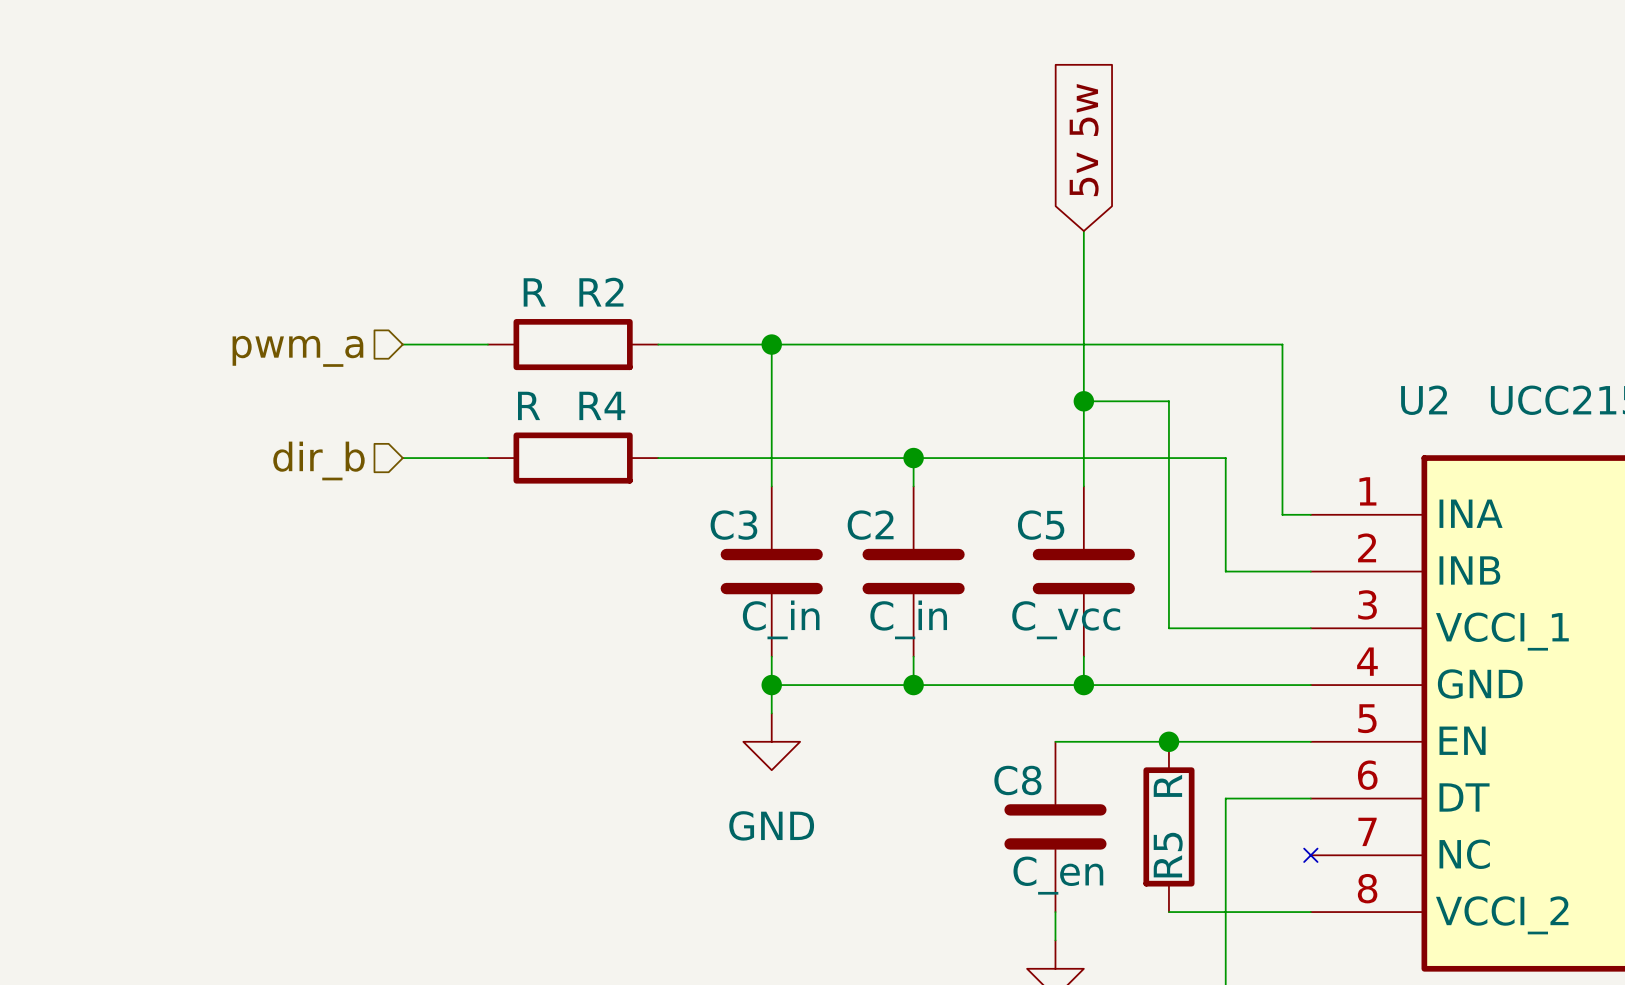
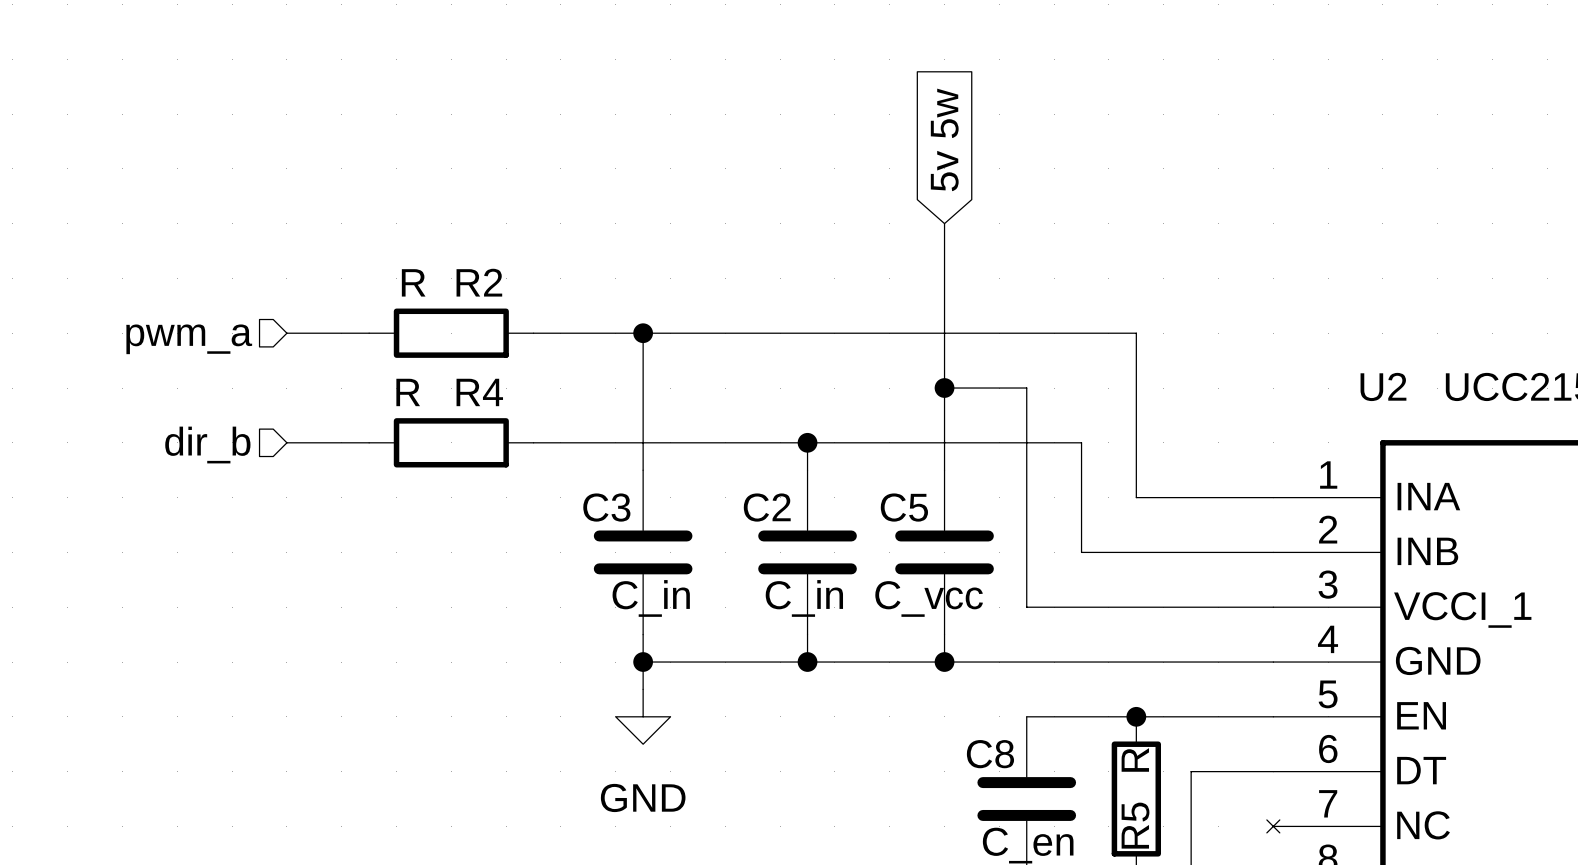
global label position: 5v 5w (1084, 140) -> 5v 5w (944, 139)
wire: (1083, 231) (1083, 486) -> (944, 223) (944, 470)
wire: (402, 344) (487, 344) -> (286, 333) (369, 333)
wire: none -> (533, 333) (643, 333) (643, 470)
R2 position: (573, 344) -> (451, 333)
junction: none -> (643, 333)
wire: (771, 344) (771, 486) -> none
junction: (771, 344) -> none
wire: (1168, 344) (1282, 344) (1282, 514) -> none
hierarchical label position: pwm_a (297, 351) -> pwm_a (189, 339)
wire: none -> (944, 388) (1026, 388) (1026, 607) (1136, 607)
junction: none -> (944, 388)
wire: (1083, 401) (1168, 401) -> (1136, 333) (1136, 388)
junction: (1083, 401) -> none
wire: (402, 458) (487, 458) -> (286, 442) (369, 442)
wire: none -> (533, 442) (643, 442)
R4 position: (573, 458) -> (451, 442)
junction: none -> (807, 442)
wire: (913, 458) (913, 486) -> (807, 442) (807, 470)
junction: (913, 458) -> none
wire: (1112, 458) (1225, 458) (1225, 571) -> (1081, 442) (1081, 552) (1191, 552)
hierarchical label position: dir_b (318, 460) -> dir_b (207, 445)
wire: (1168, 514) (1168, 628) -> (1136, 497) (1245, 497)
C3 position: (771, 571) -> (643, 552)
C2 position: (913, 571) -> (807, 552)
C5 position: (1083, 571) -> (944, 552)
wire: (771, 656) (771, 713) -> (643, 634) (643, 689)
wire: (913, 656) (913, 685) -> (807, 634) (807, 662)
wire: (1083, 656) (1083, 685) -> (944, 634) (944, 662)
wire: none -> (643, 662) (752, 662)
junction: none -> (643, 662)
junction: (771, 685) -> none
junction: none -> (807, 662)
junction: (913, 685) -> none
junction: none -> (944, 662)
junction: (1083, 685) -> none
power symbol position: GND (771, 741) -> GND (643, 716)

